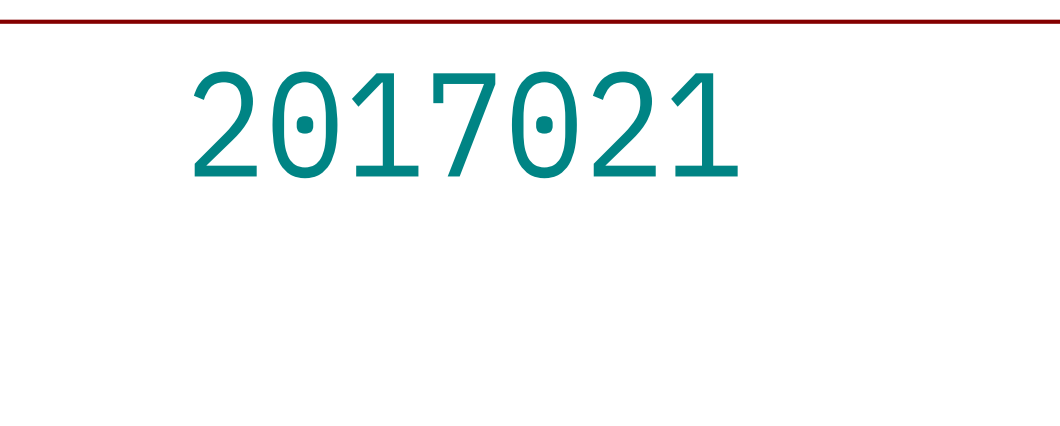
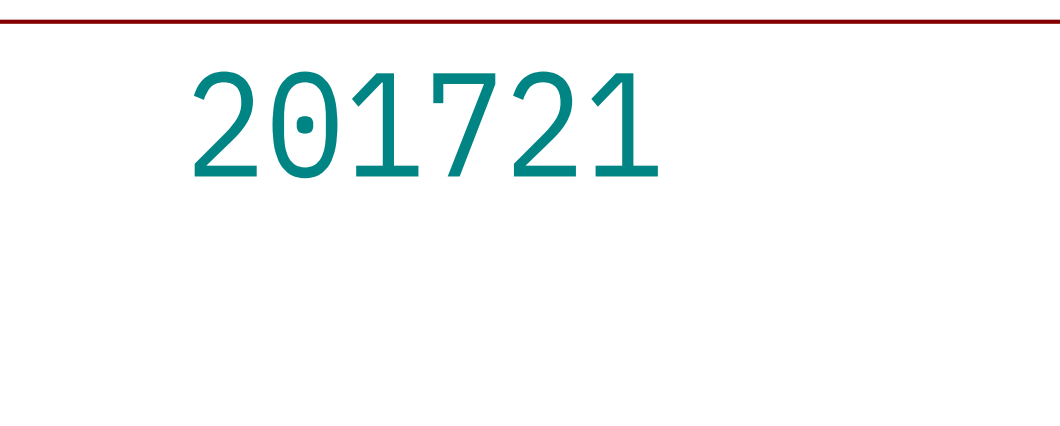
text: 2017021 (465, 124) -> 201721 (425, 124)

